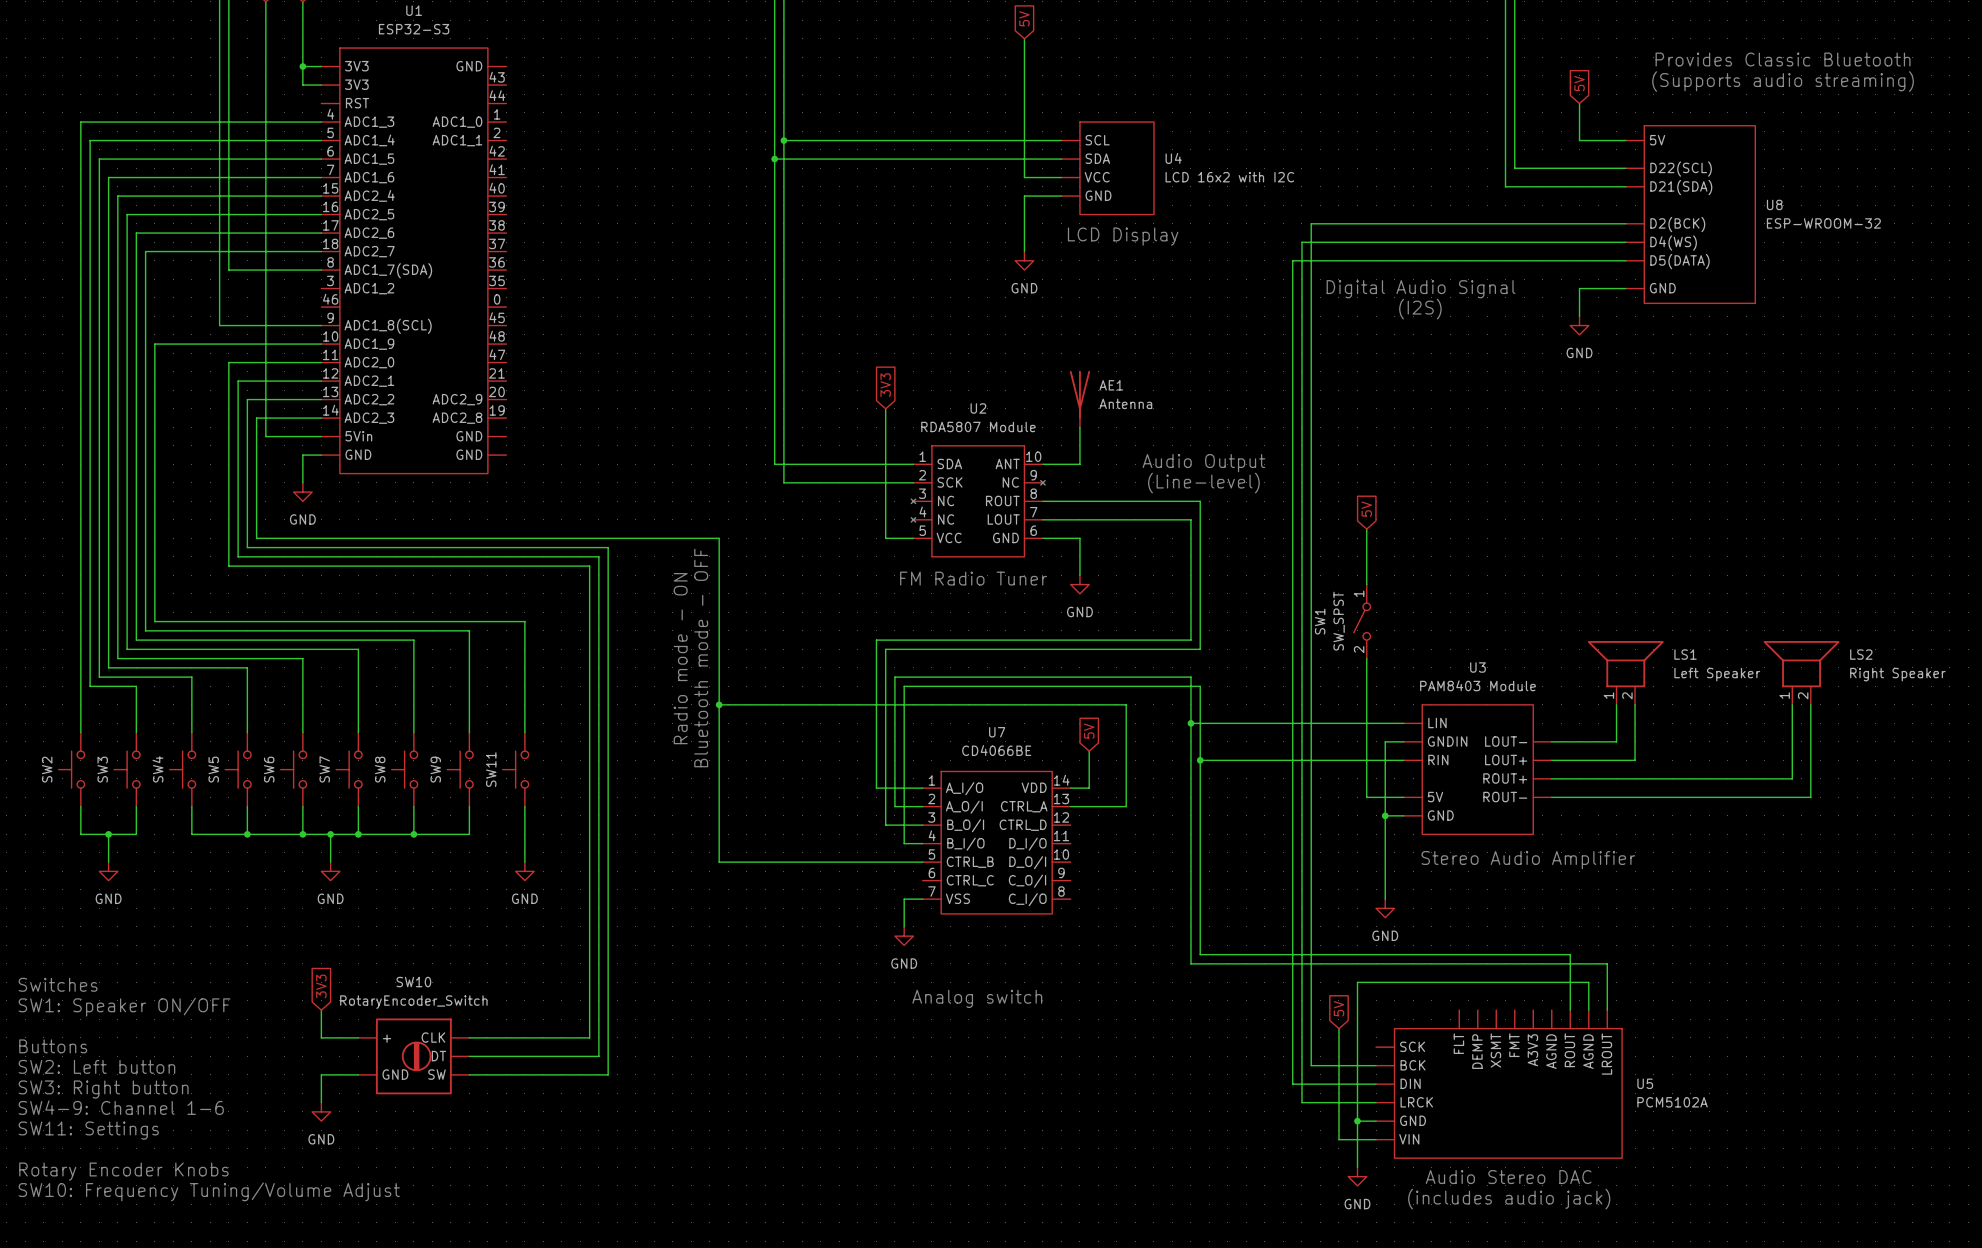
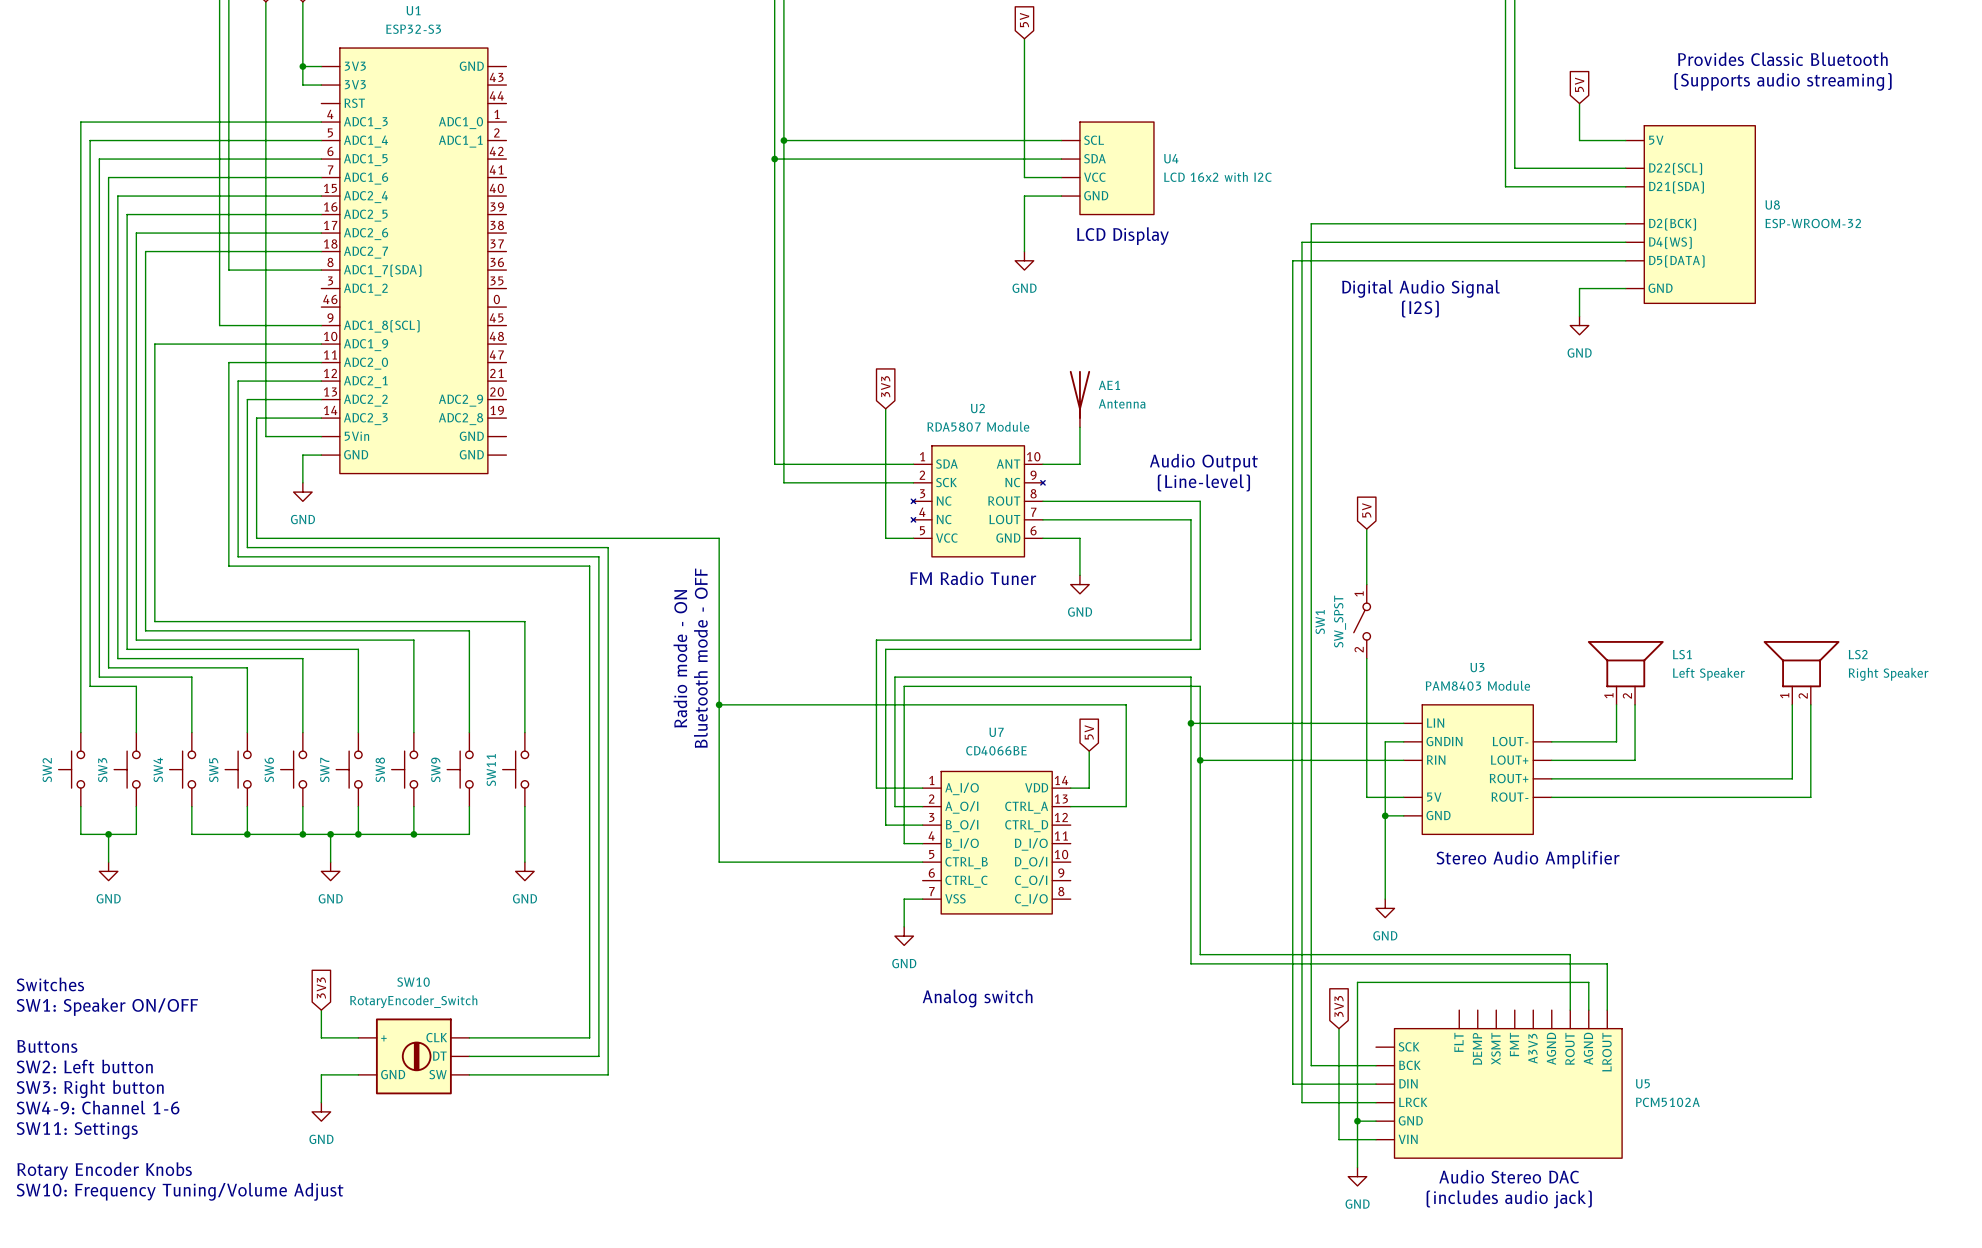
global label: 5V (1338, 1008) -> 3V3 (1339, 1006)

